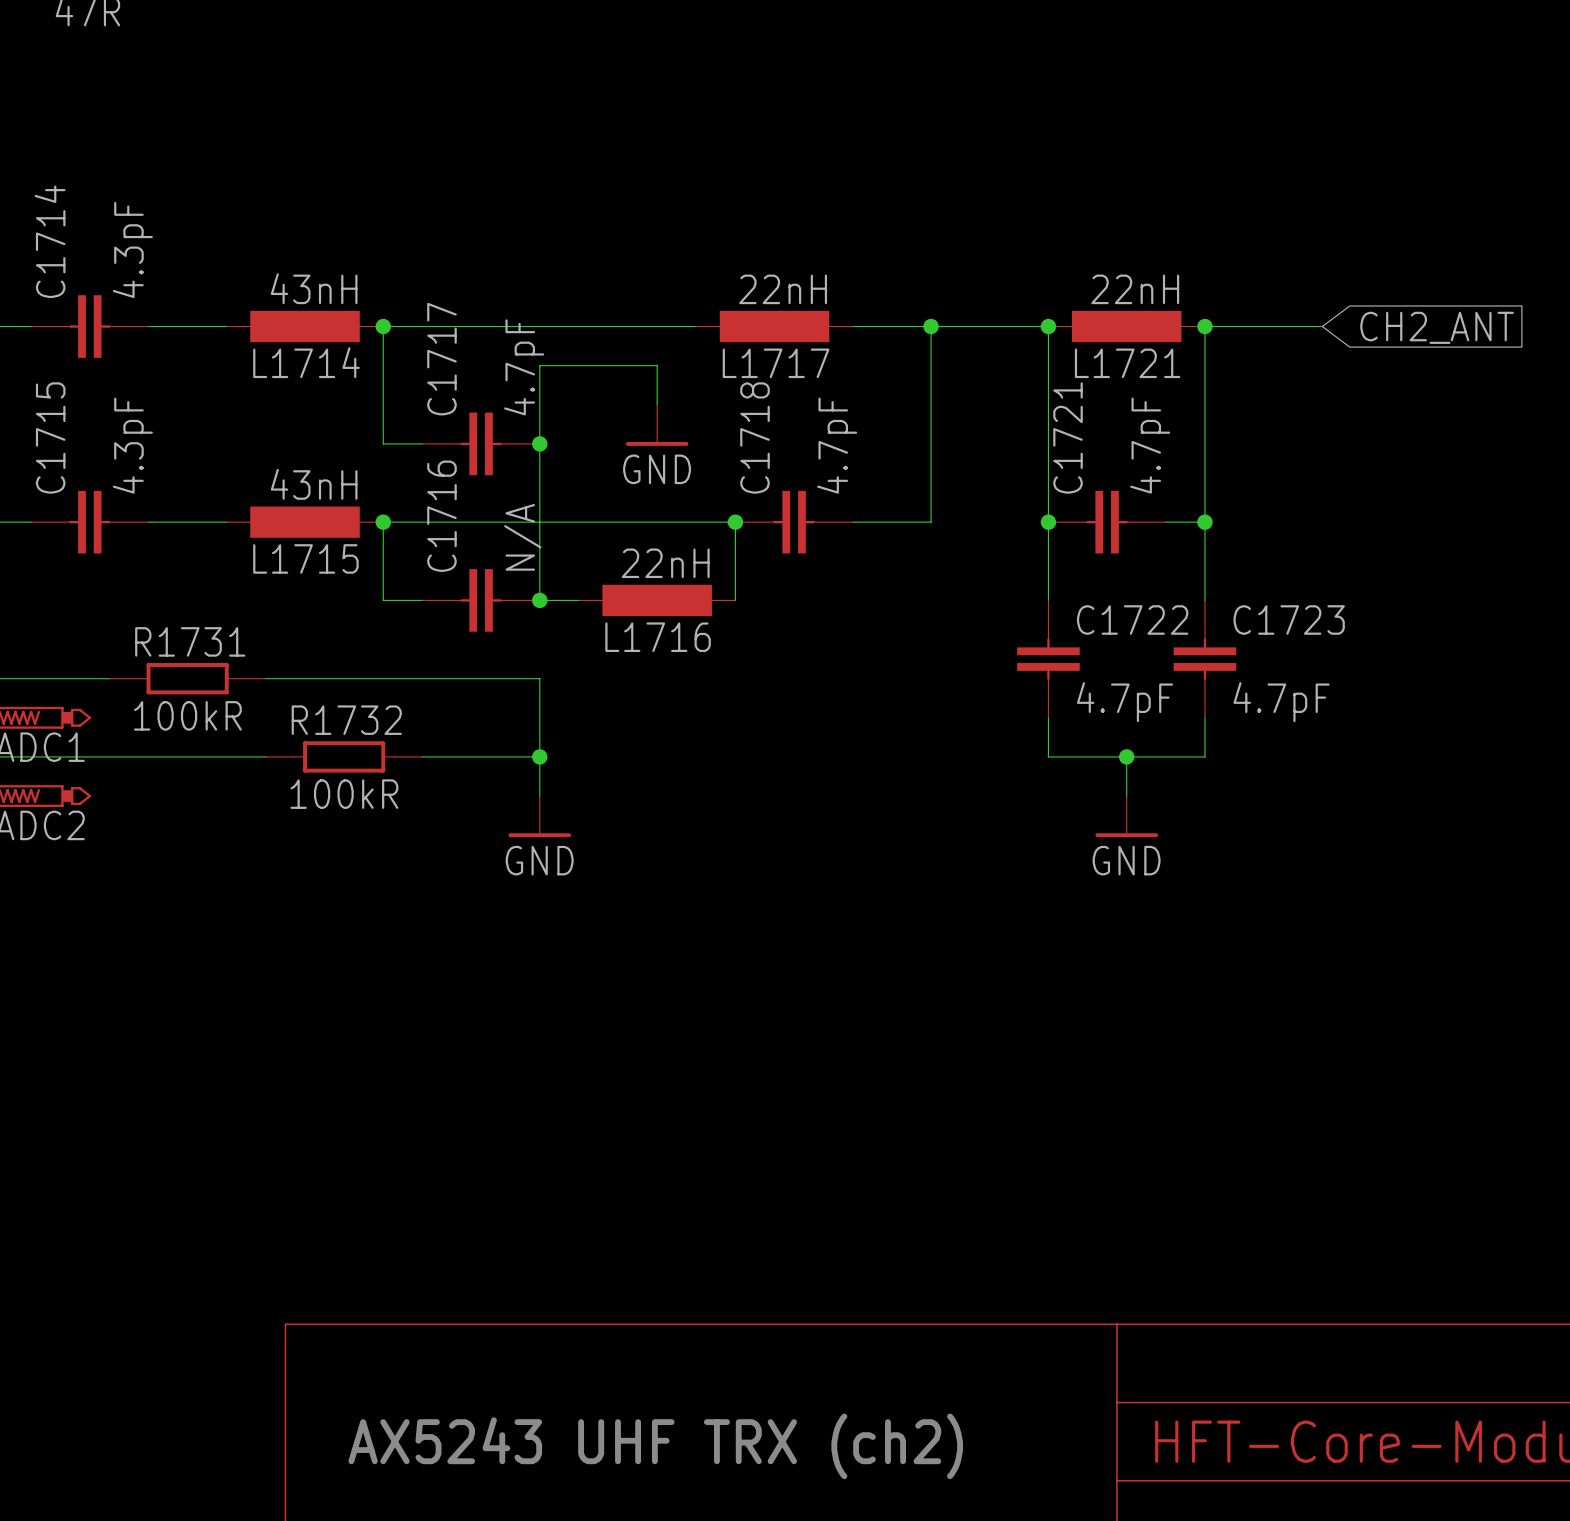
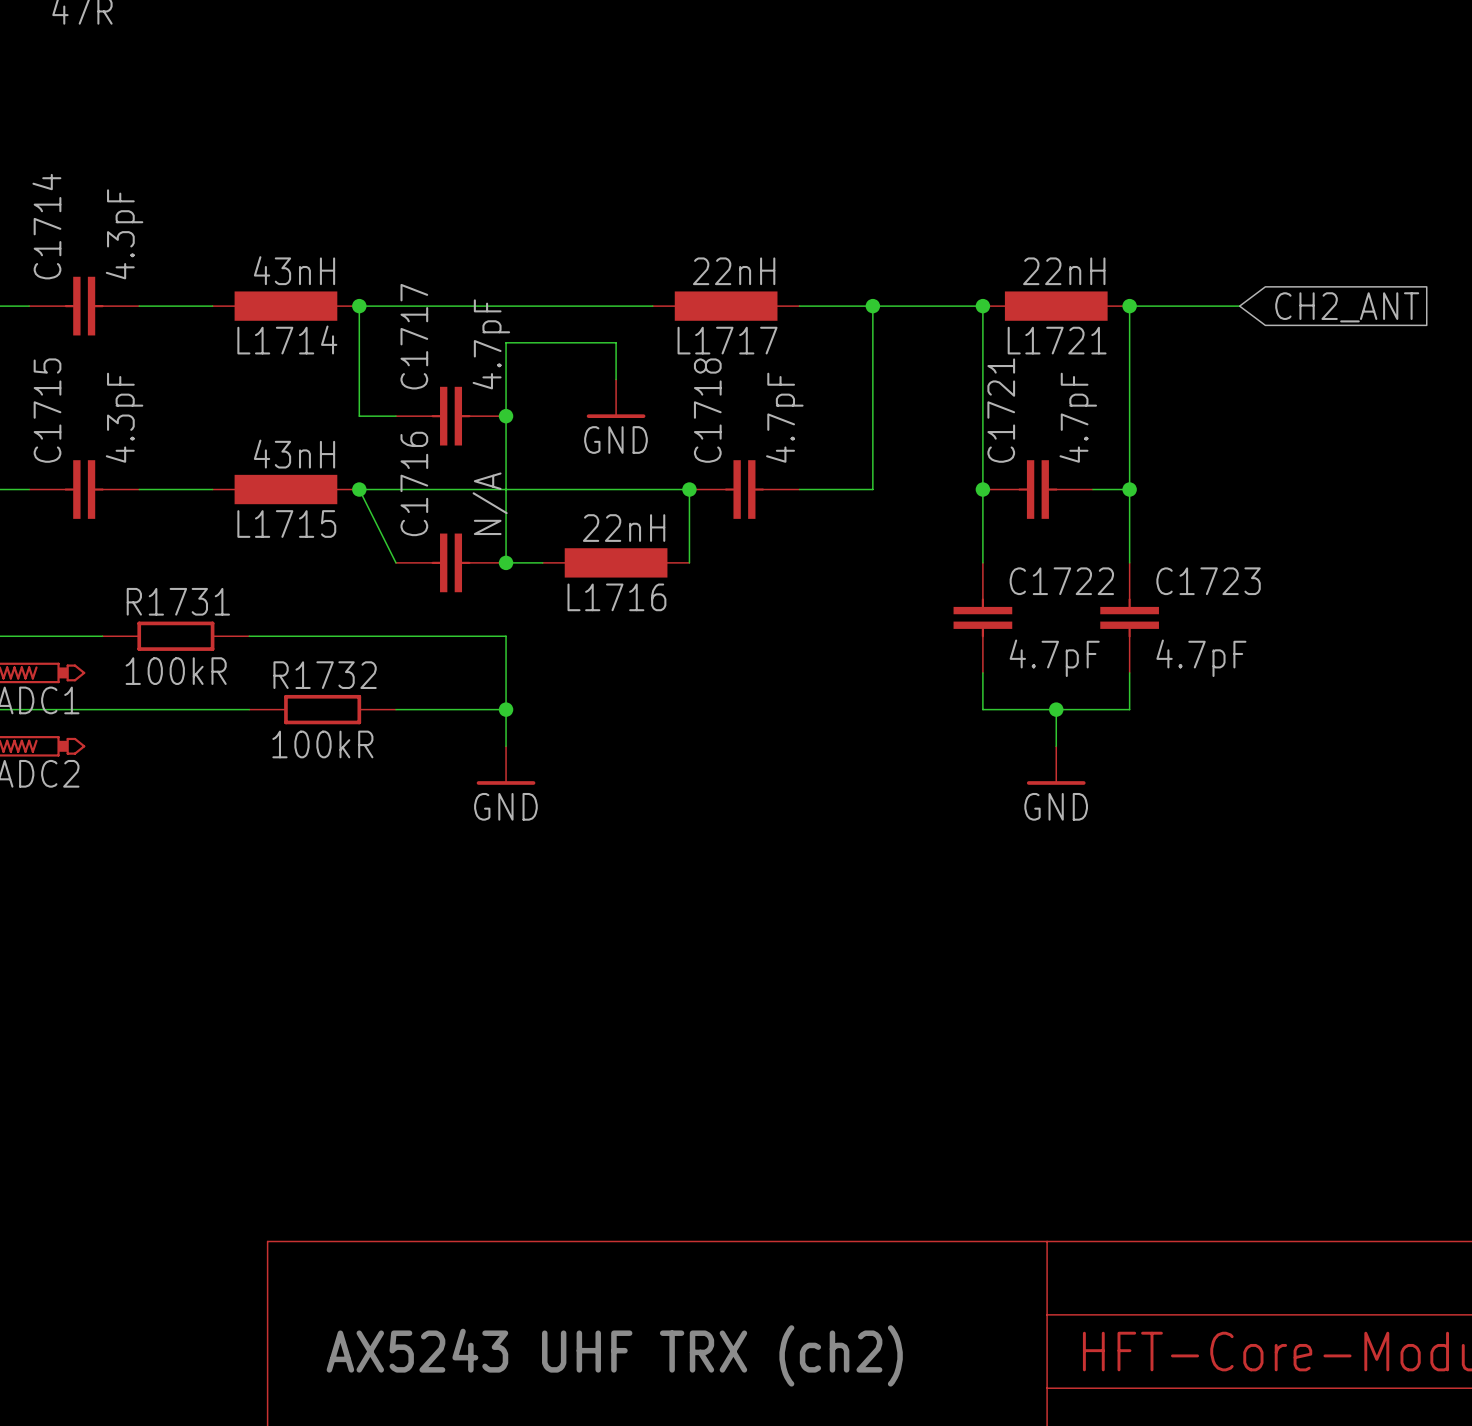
wire: (383, 522) (383, 600) (422, 600) -> (359, 489) (395, 562)

